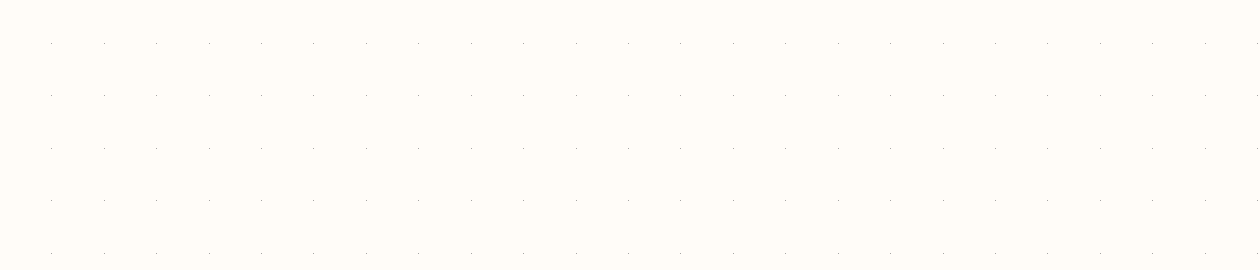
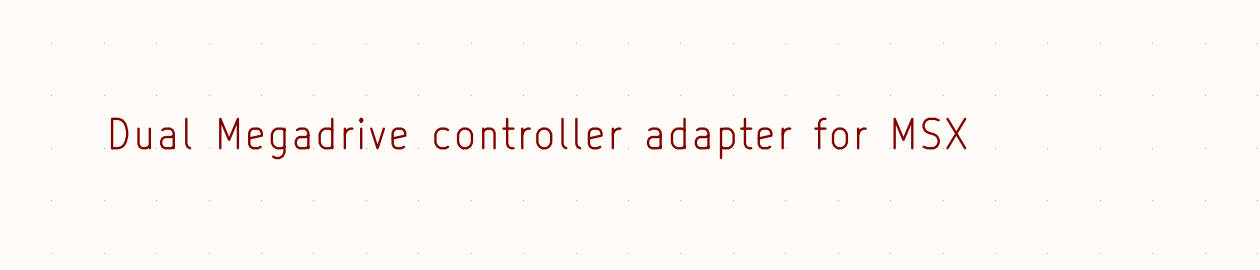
text: none -> Dual Megadrive controller adapter for MSX (538, 138)

